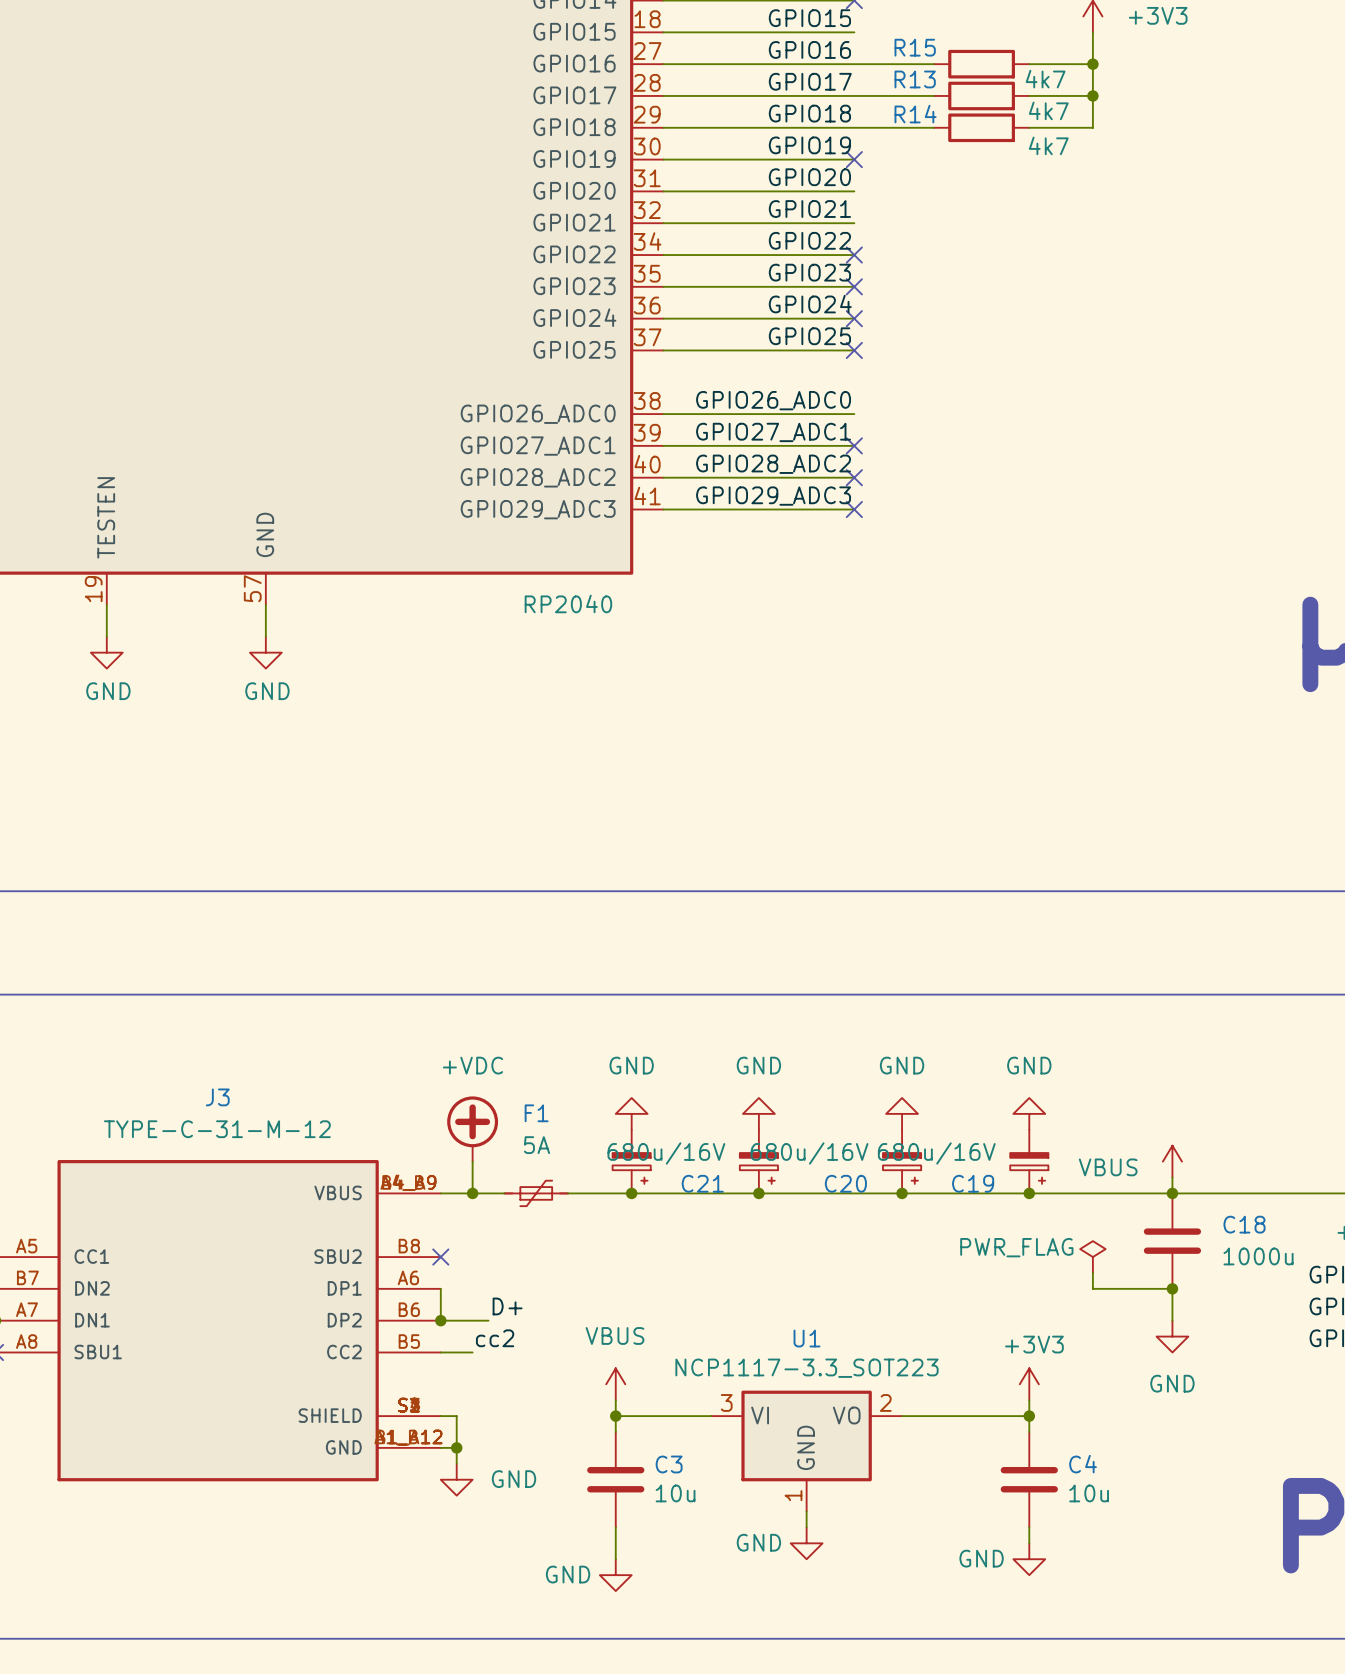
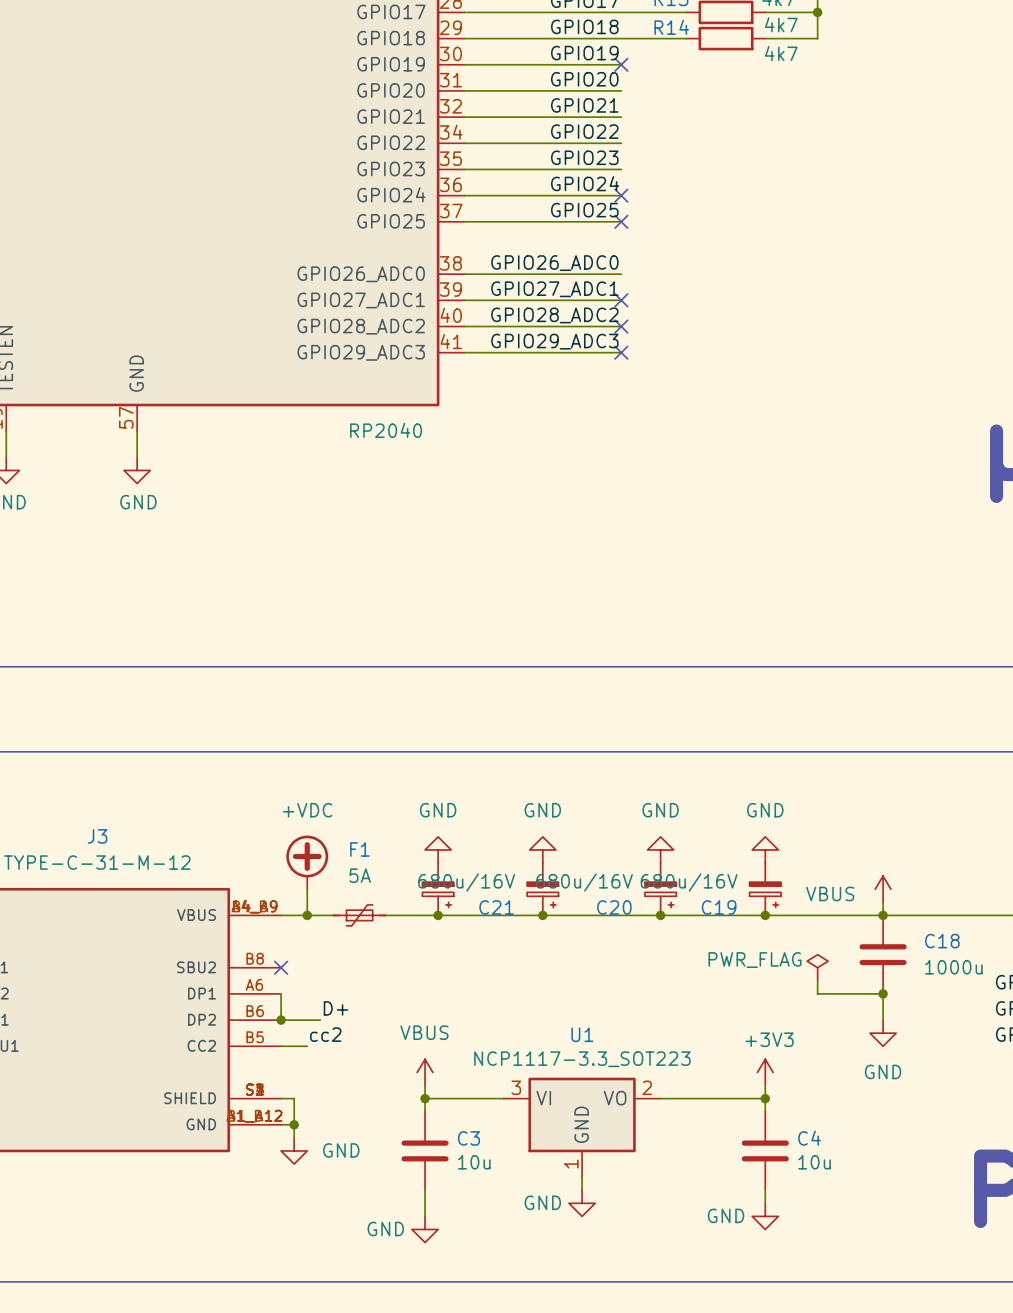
no-connect mark: (854, 255) -> none
no-connect mark: (854, 286) -> none

